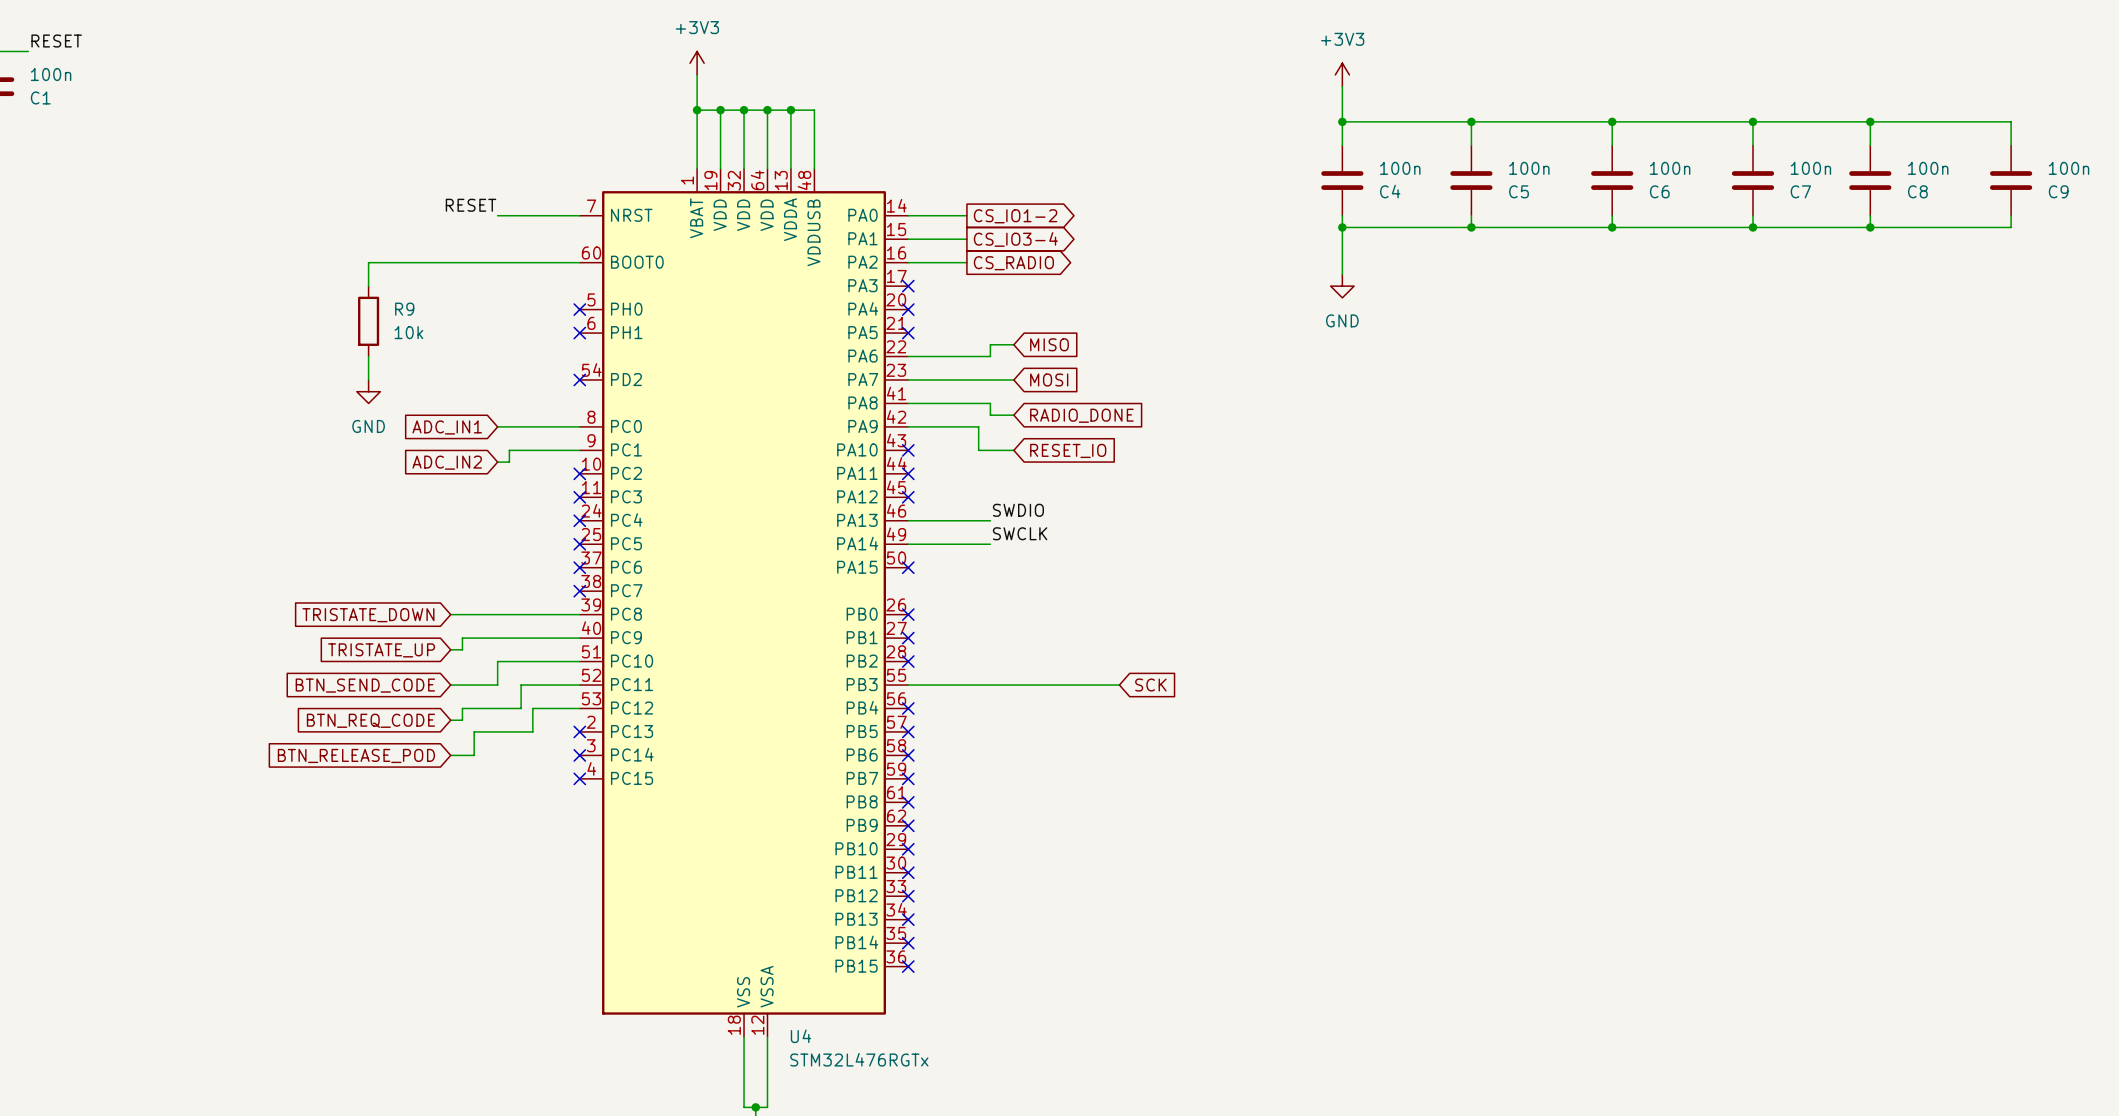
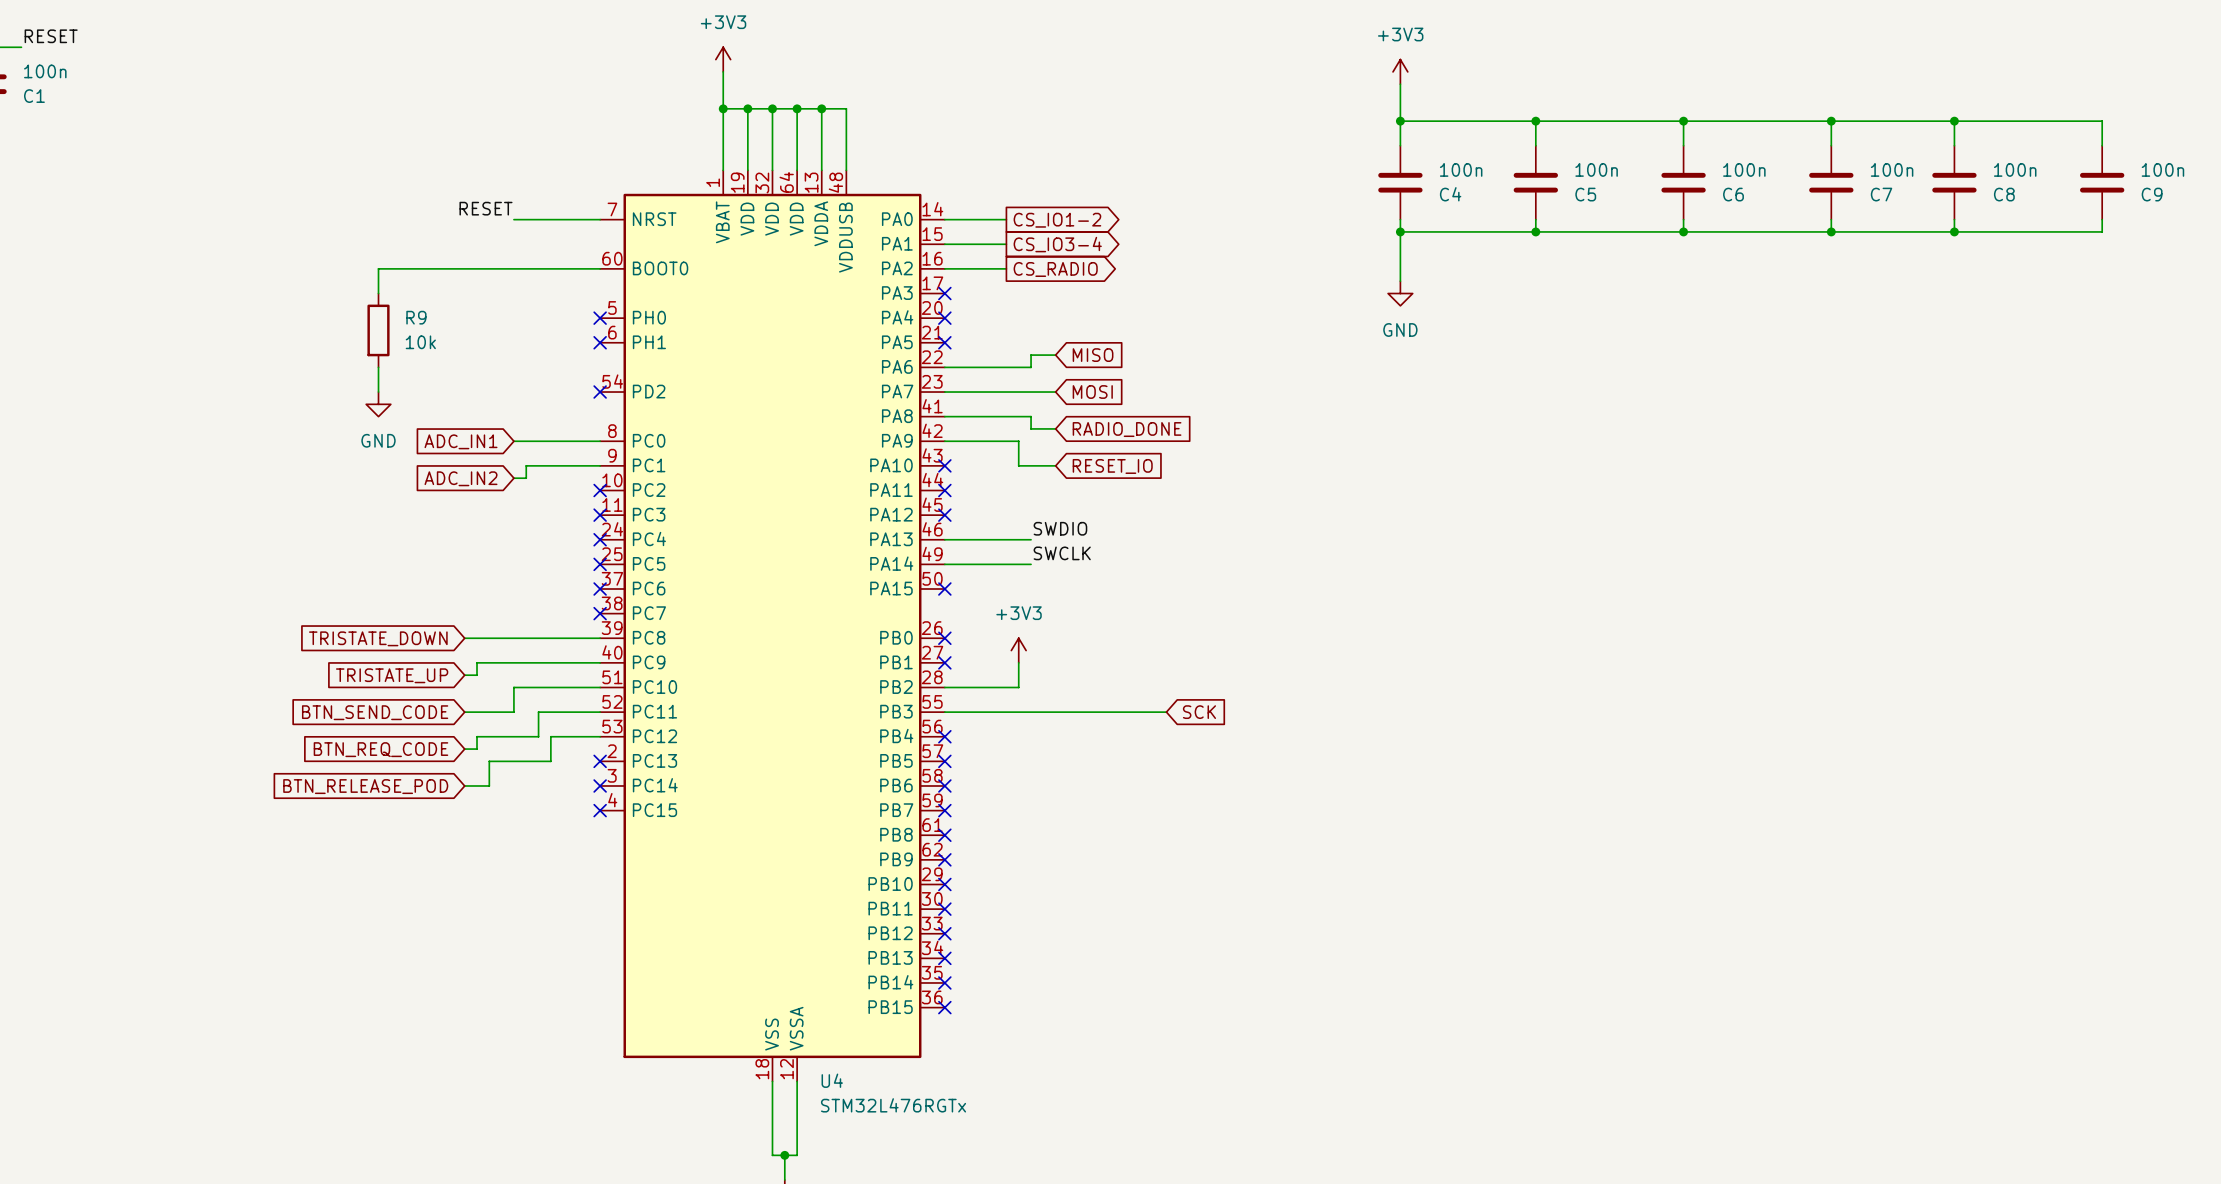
power symbol: none -> +3V3 (1018, 650)
wire: none -> (1018, 662) (1018, 687) (944, 687)
no-connect mark: (908, 661) -> none

